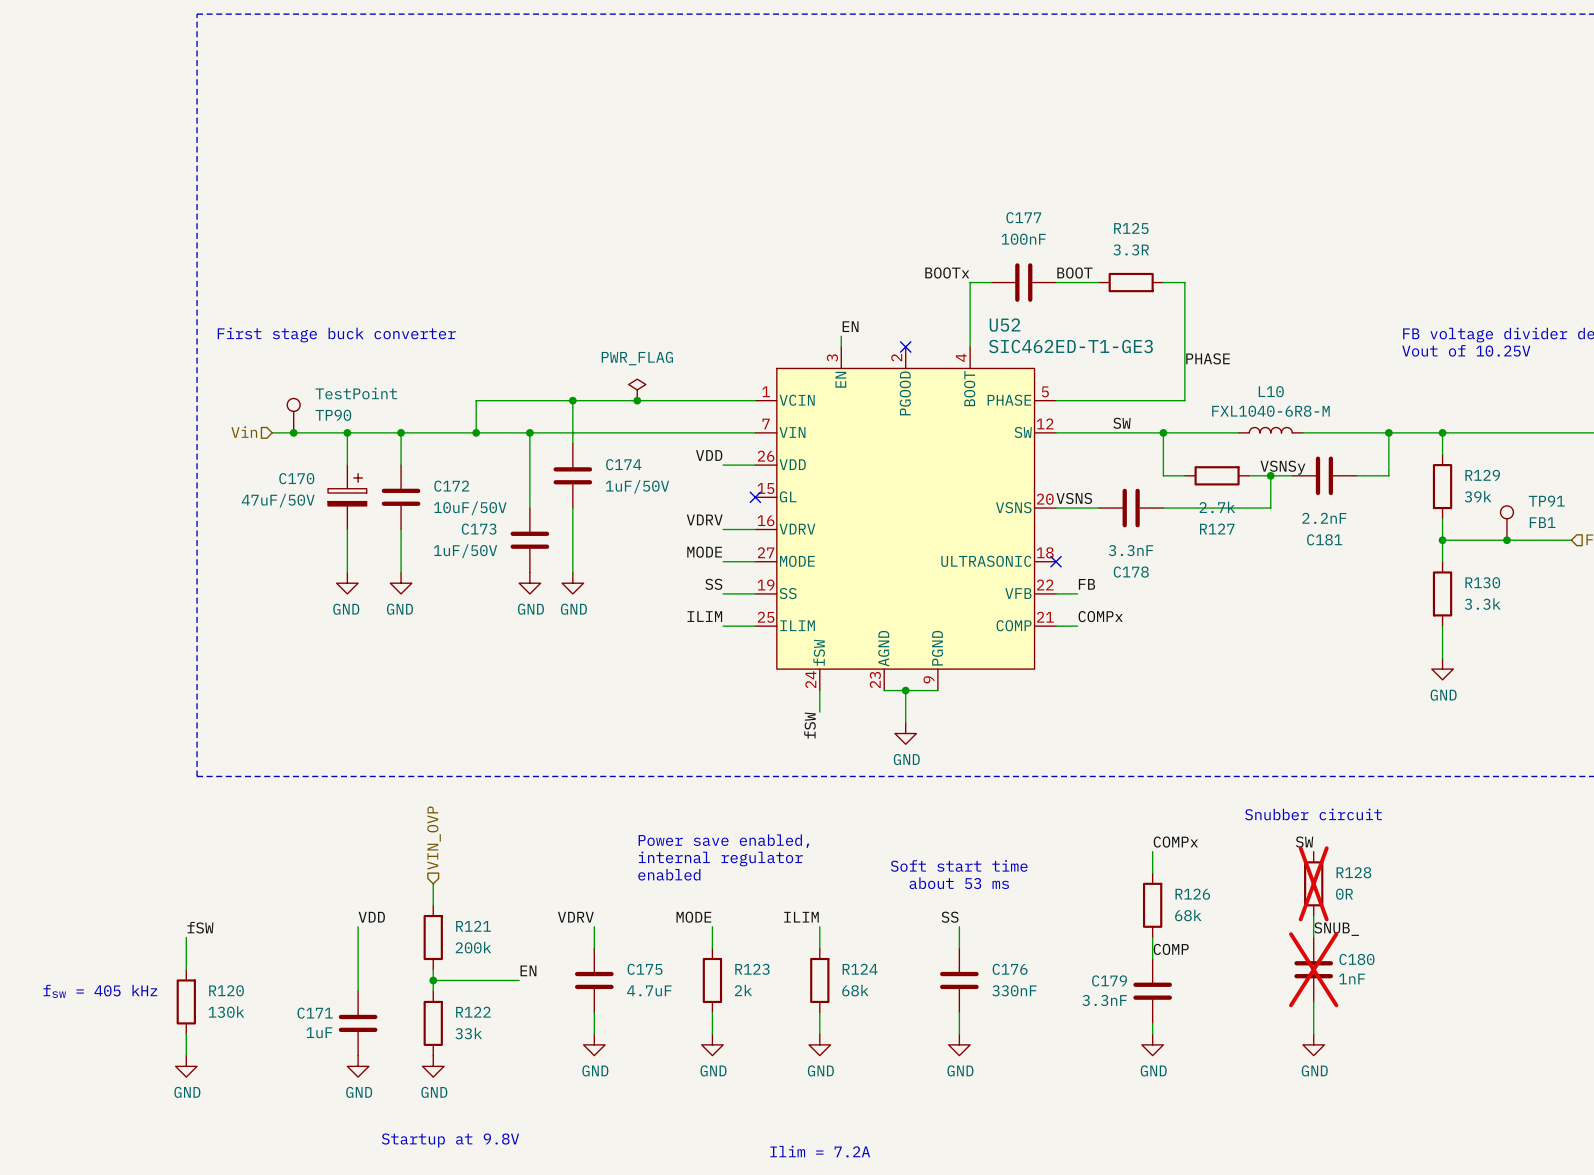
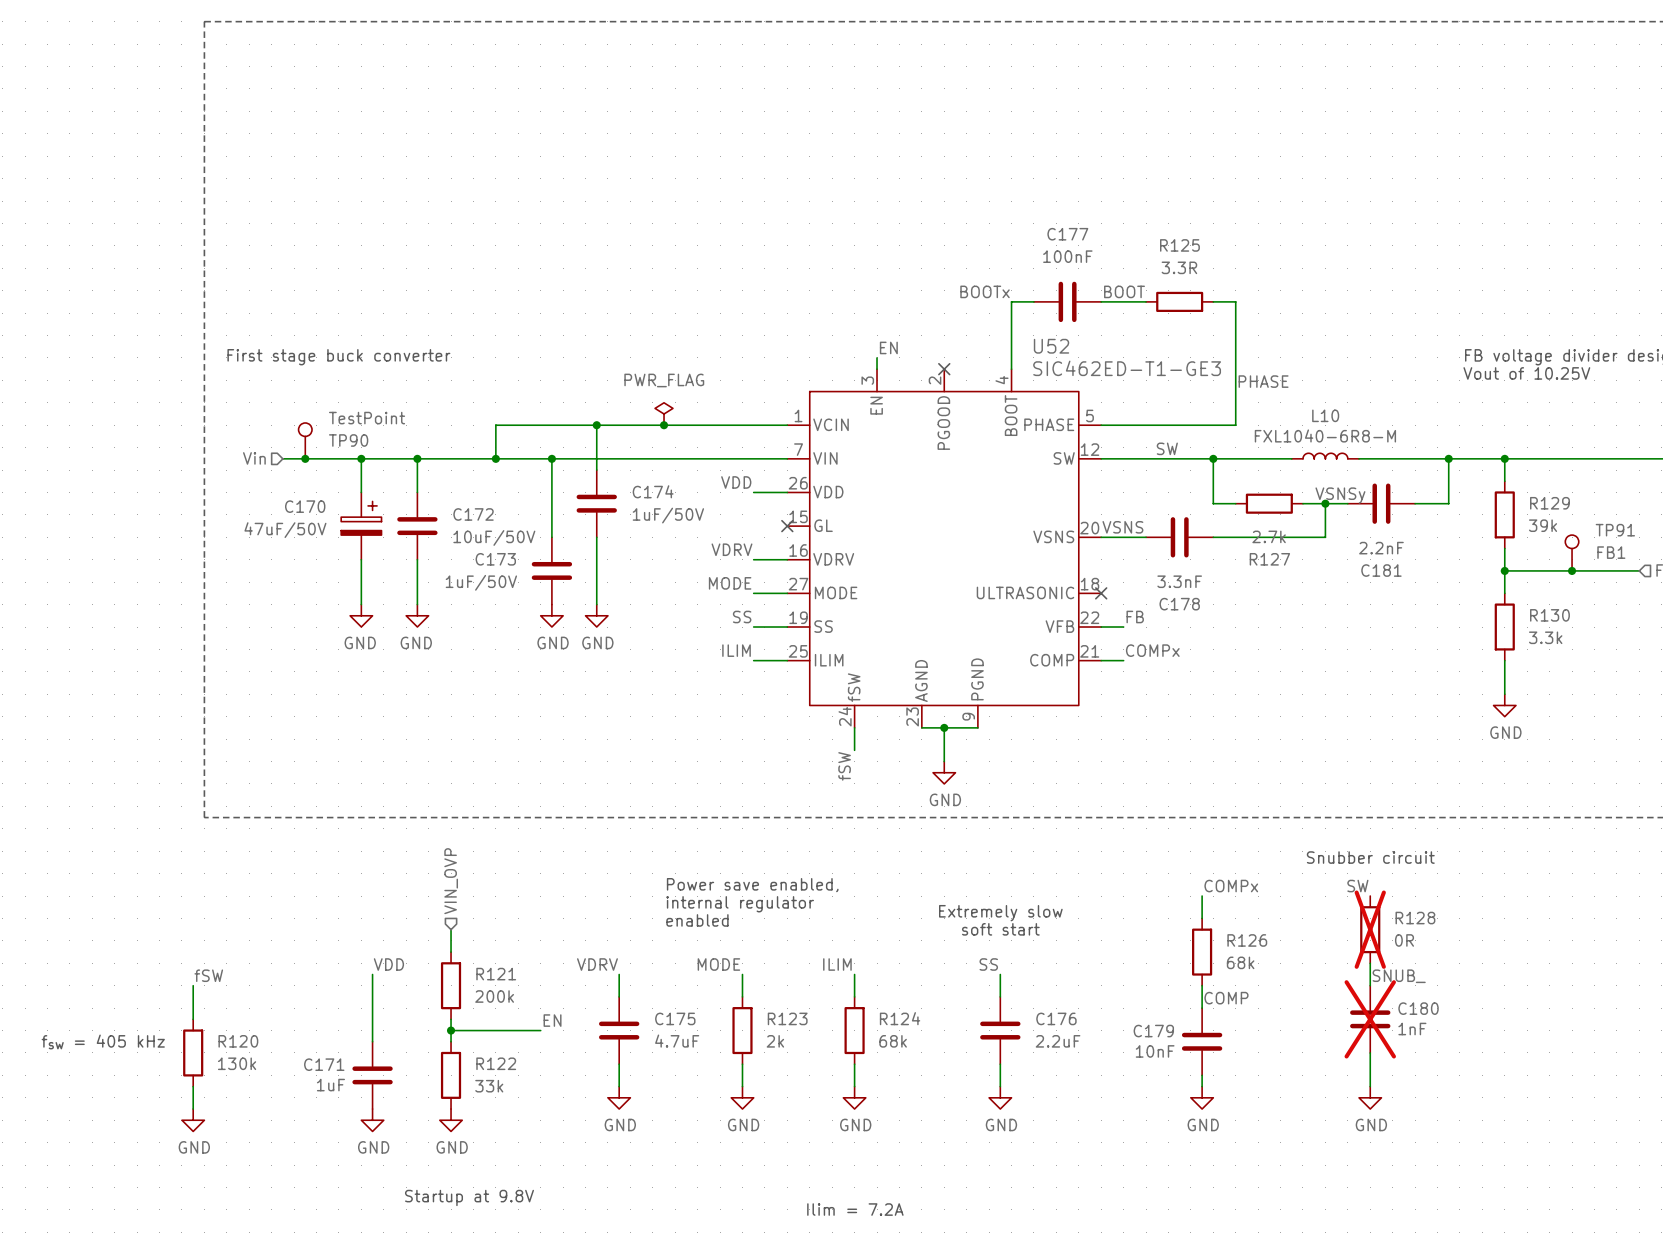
text: Soft start time (959, 865) -> Extremely slow (1000, 913)
text: about 53 ms (959, 883) -> soft start (1000, 929)
C176 value: 330nF (1014, 990) -> 2.2uF (1058, 1041)
C179 value: 3.3nF (1104, 1000) -> 10nF (1155, 1051)

